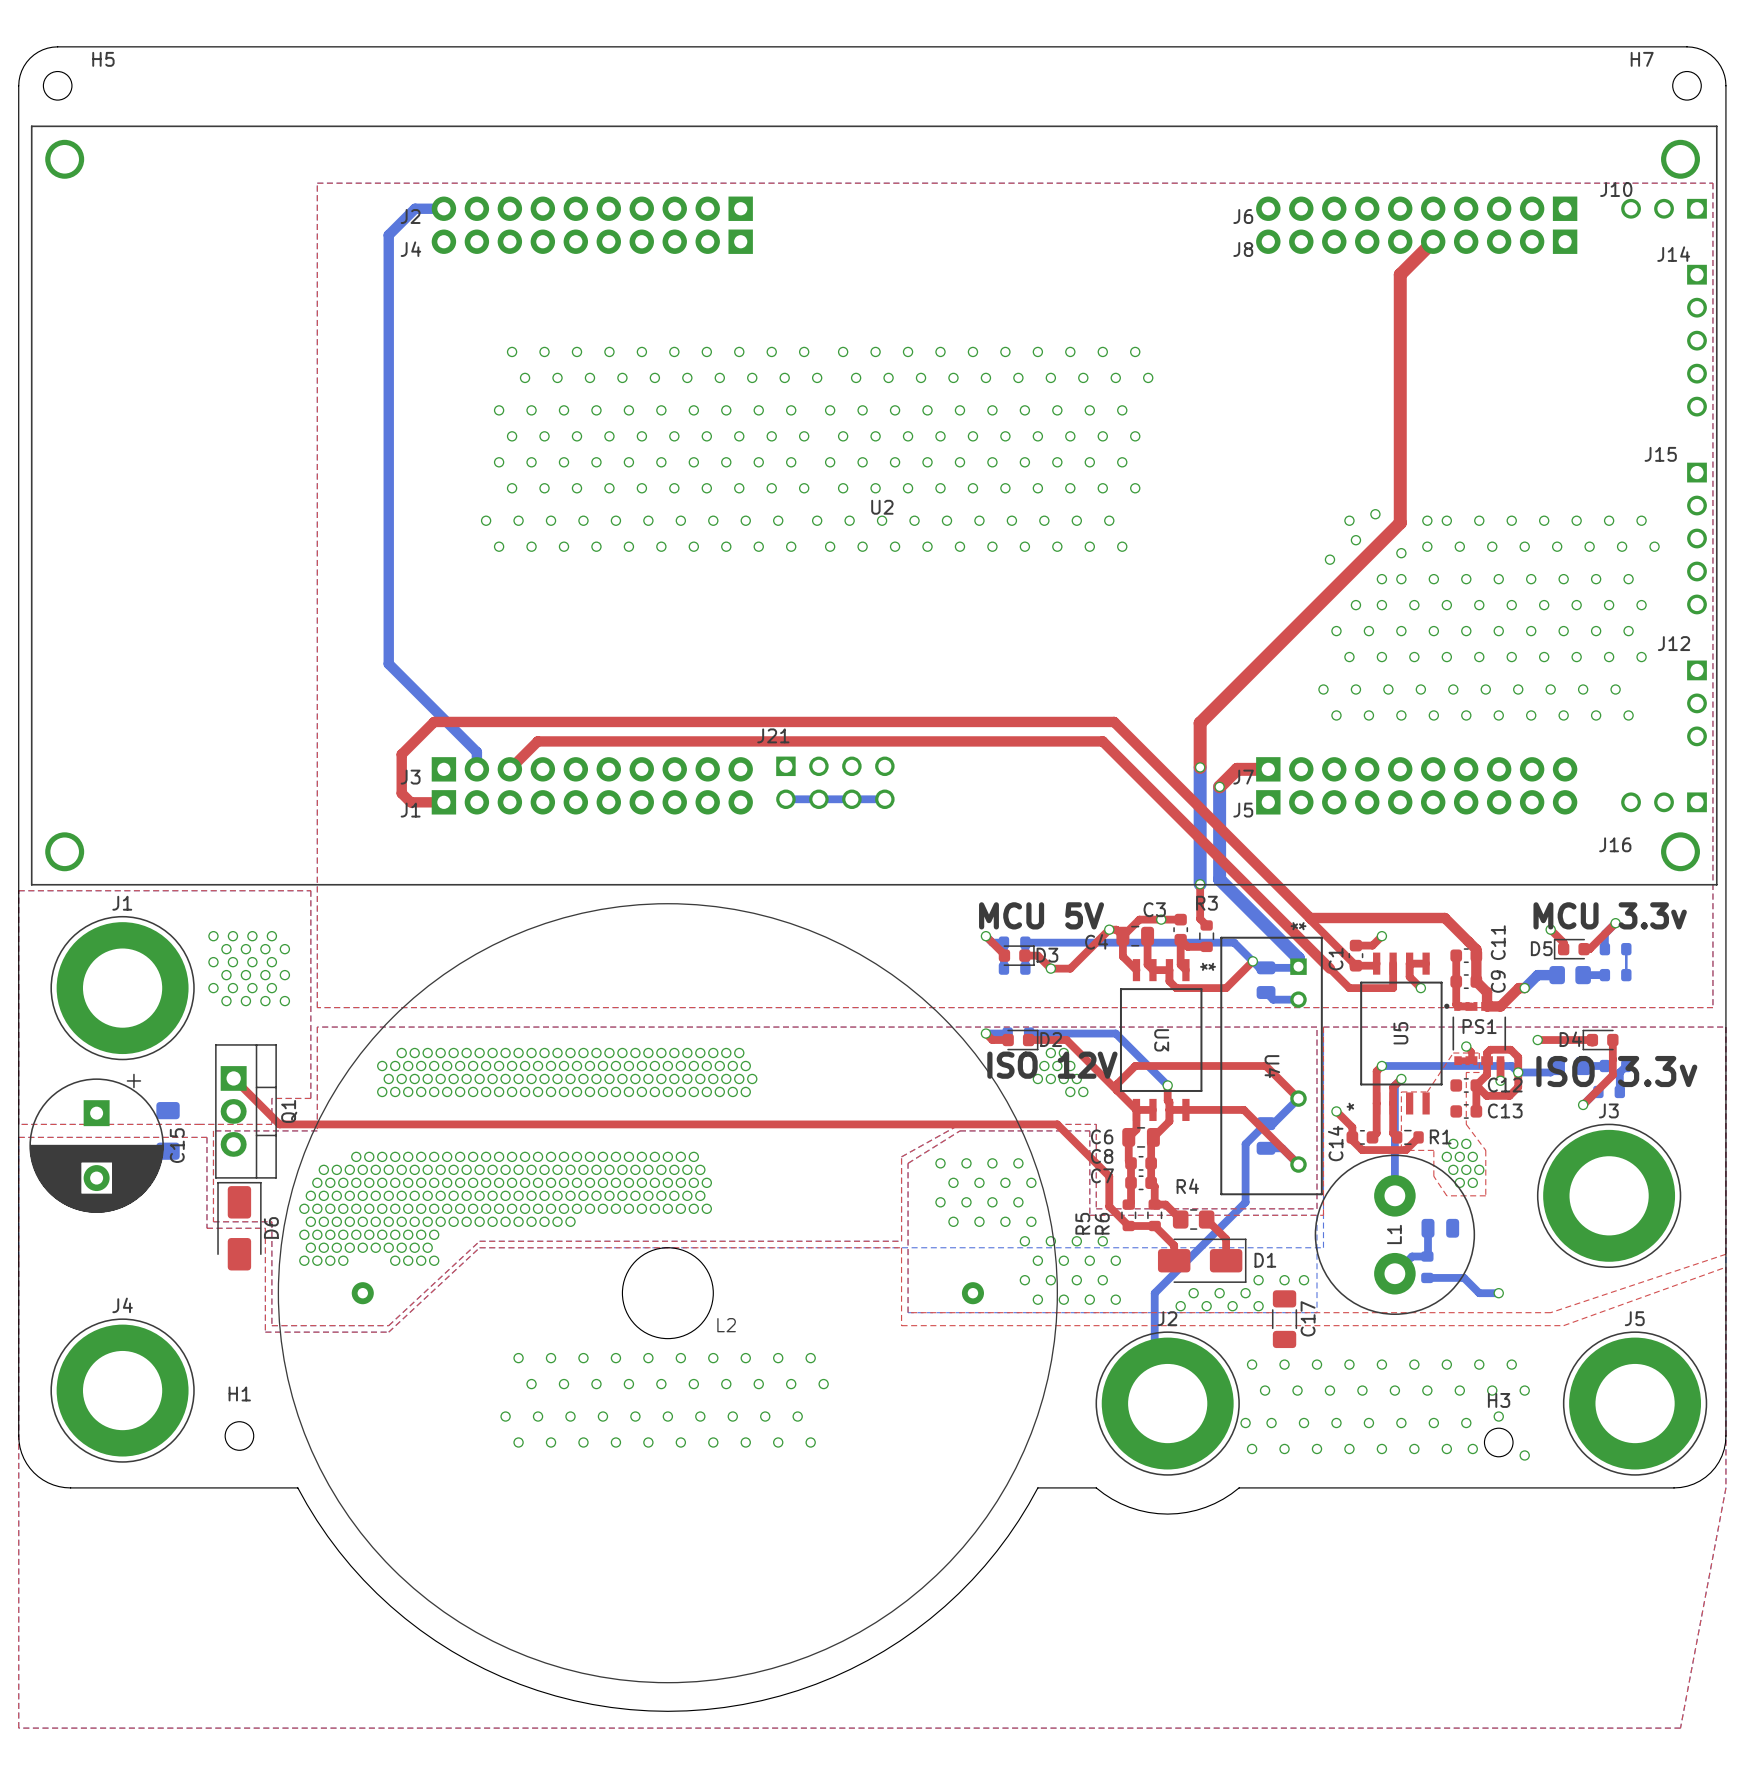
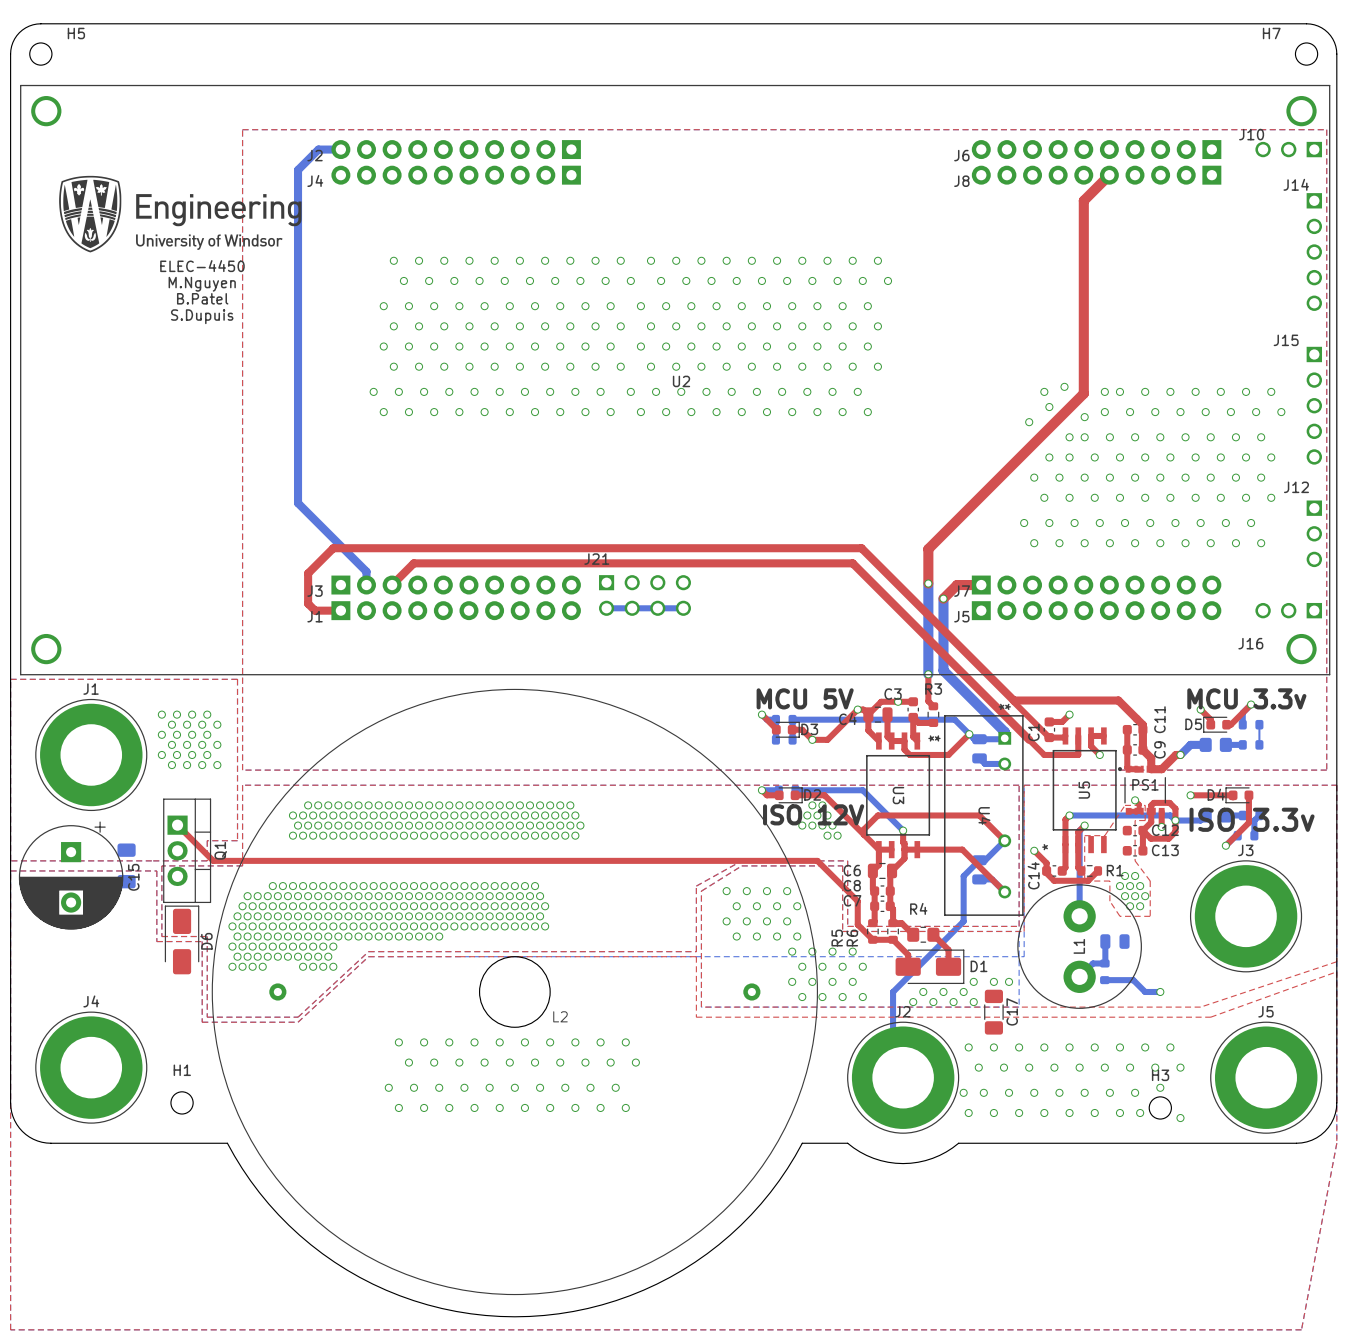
drawing: none -> [59, 175, 302, 253]
text: none -> ELEC-4450 (202, 266)
text: none -> M.Nguyen (202, 284)
text: none -> B.Patel (202, 298)
text: none -> S.Dupuis (202, 316)

